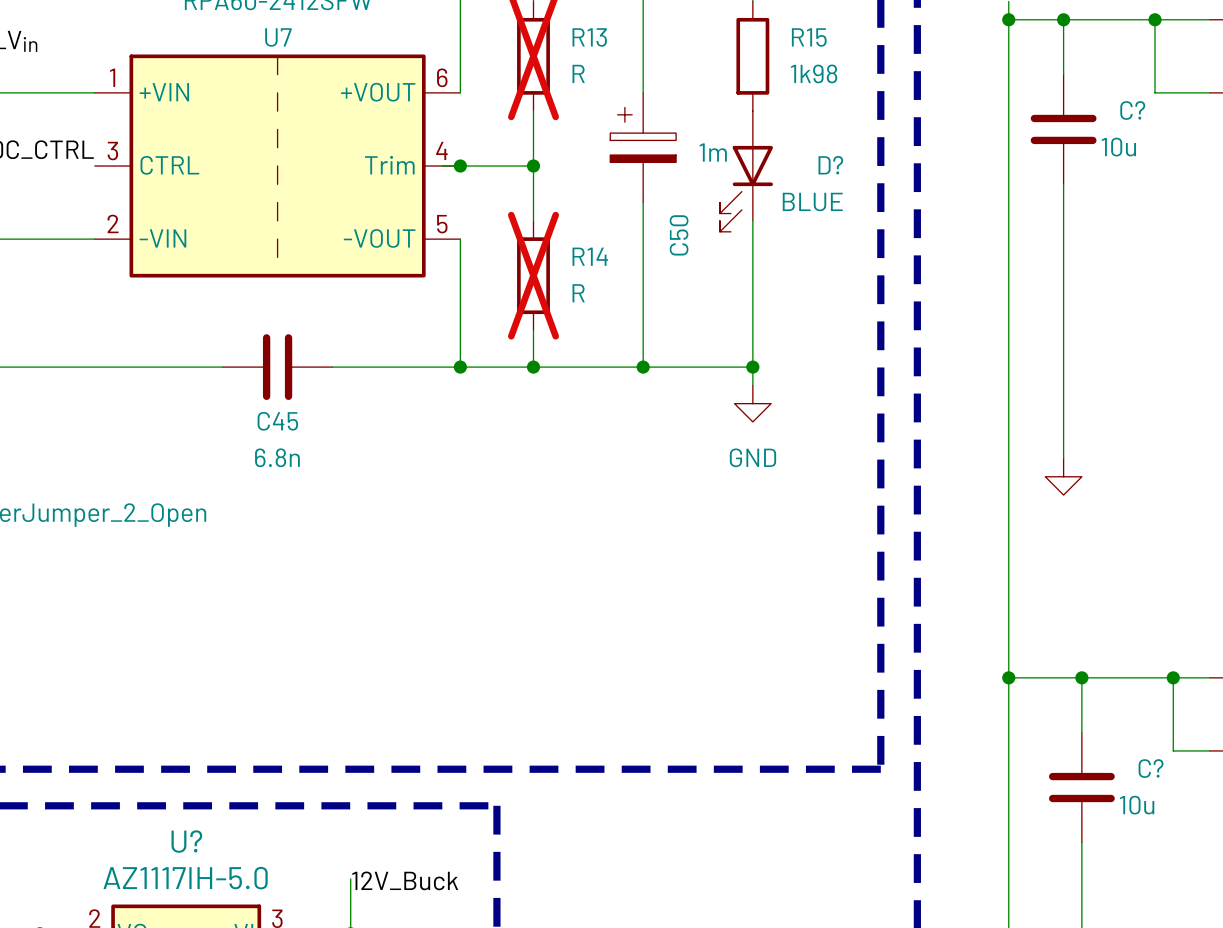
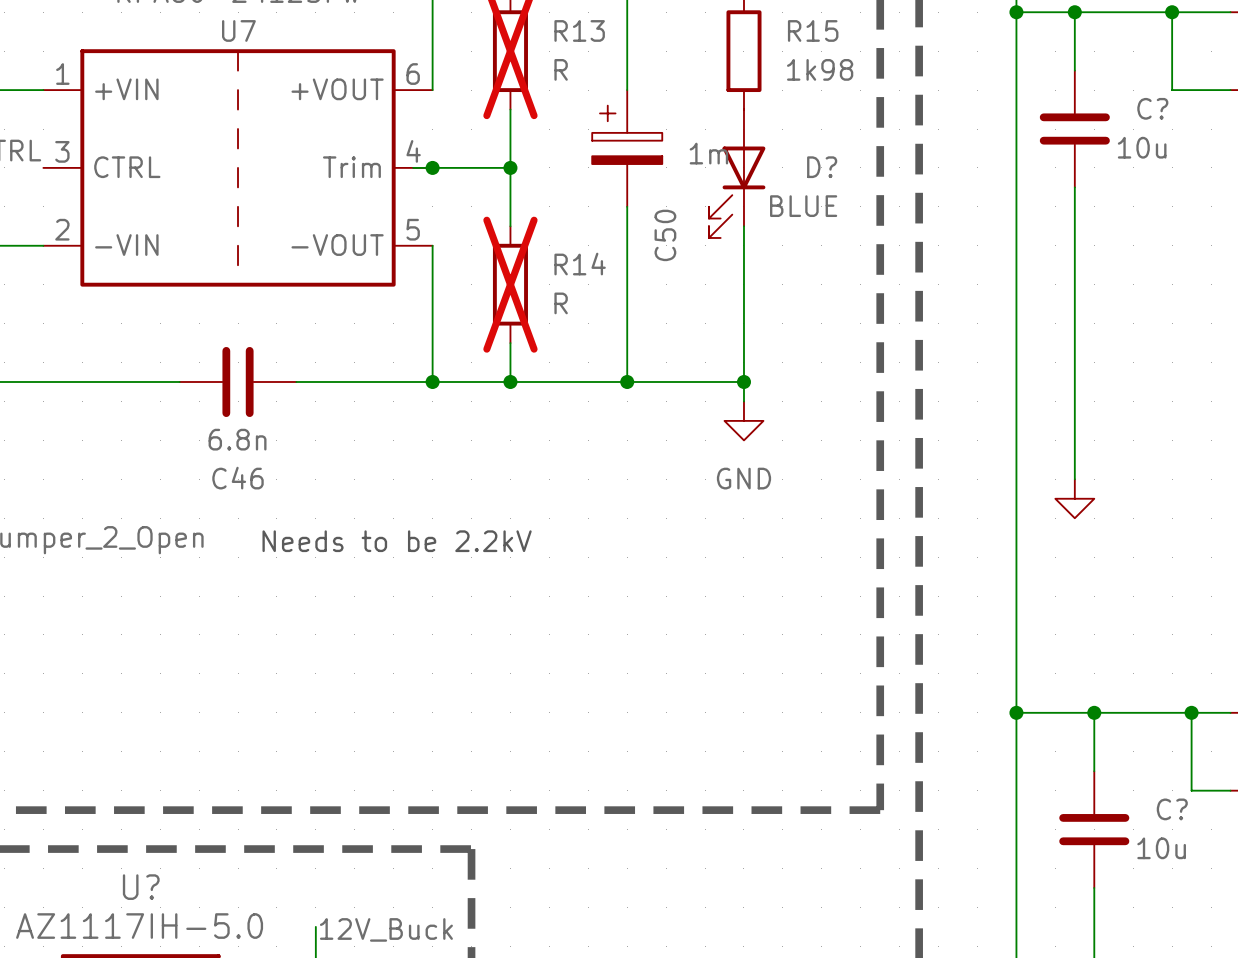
C45 name: C45 (277, 421) -> C46 (238, 478)
C45 value position: 6.8n (277, 457) -> 6.8n (237, 439)
text: none -> Needs to be 2.2kV (397, 541)

